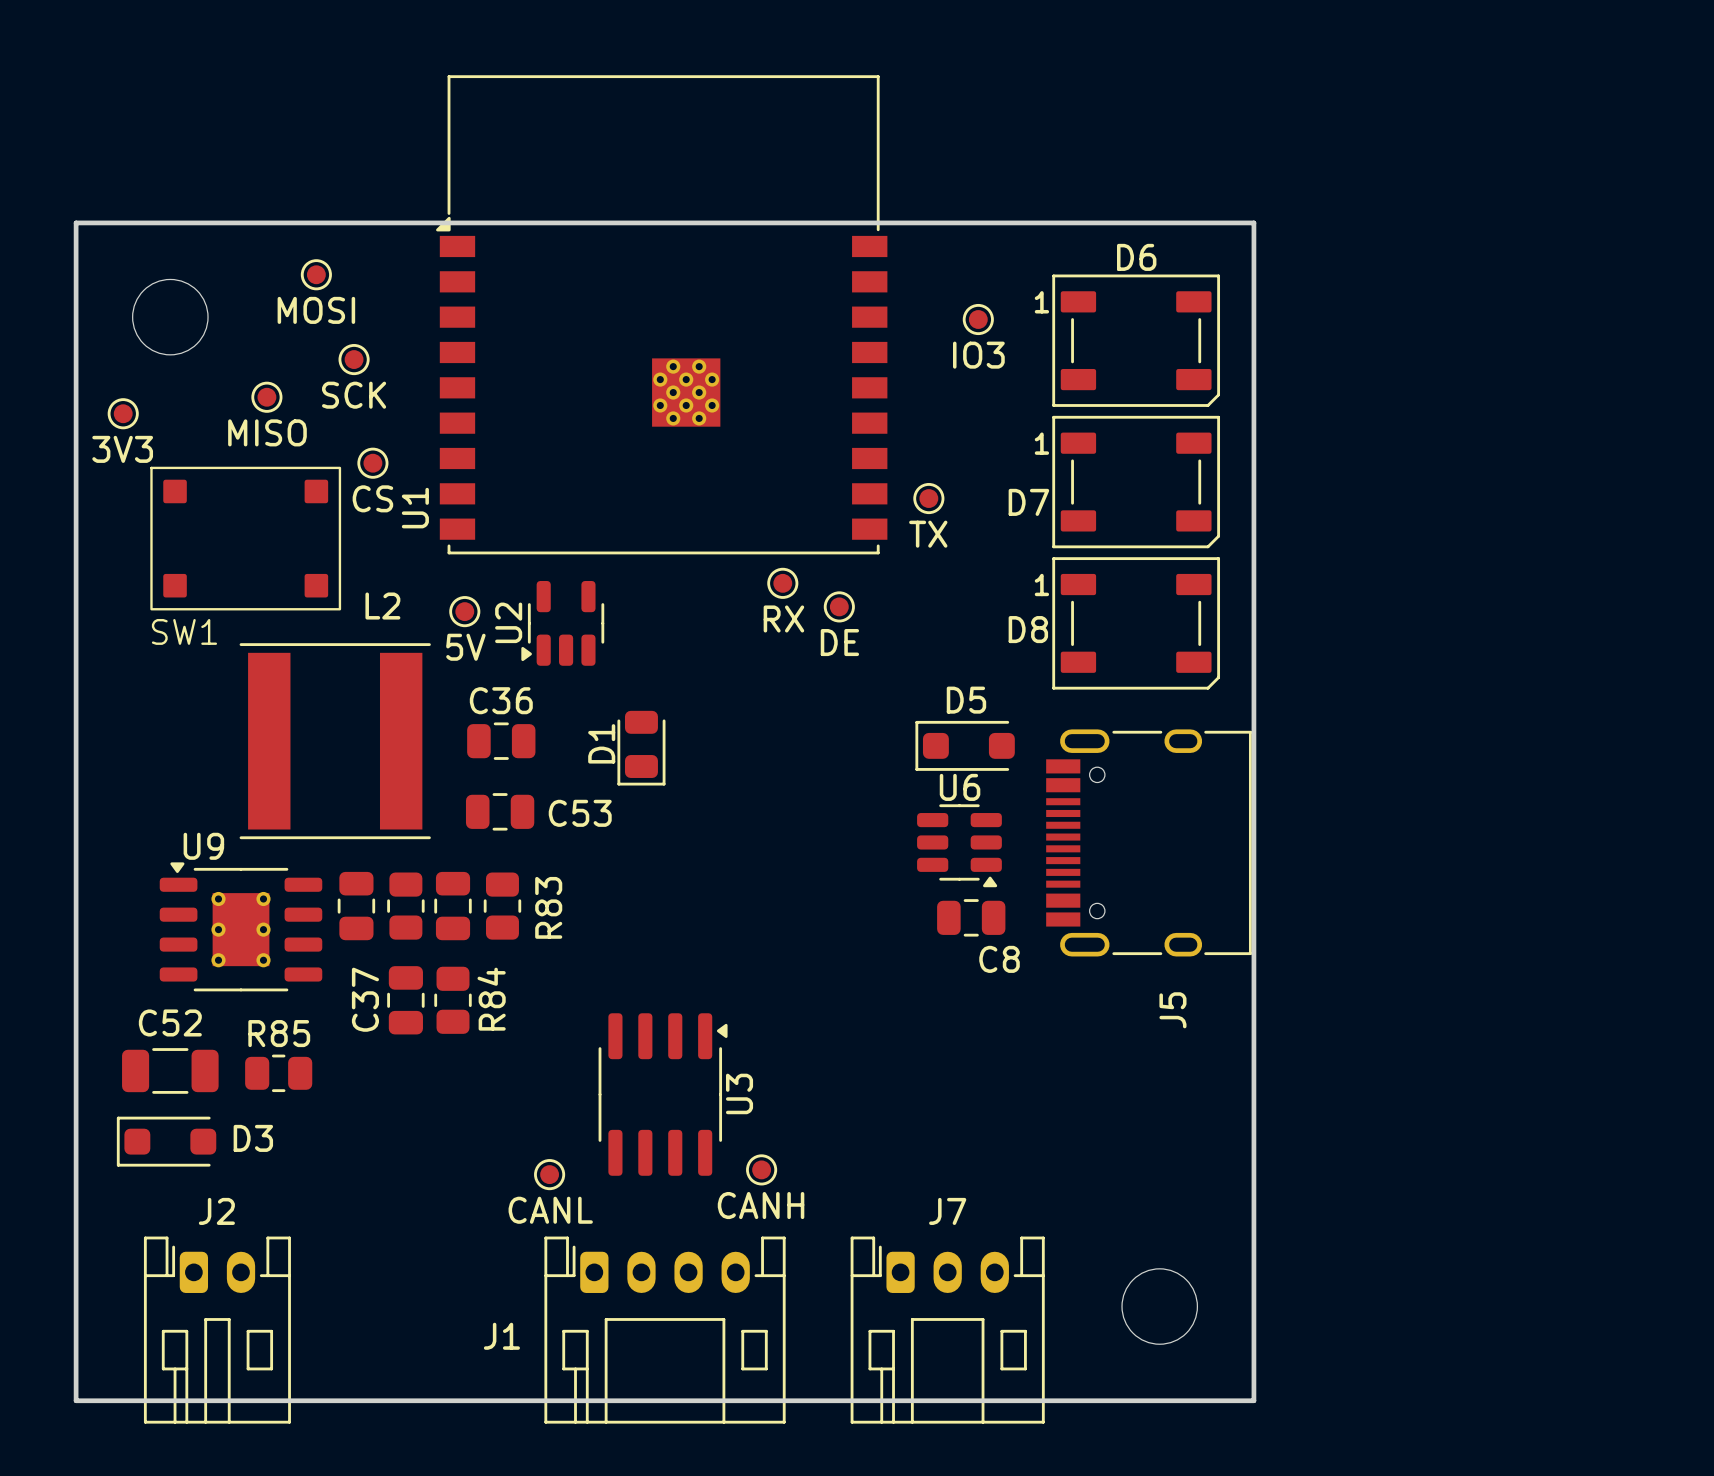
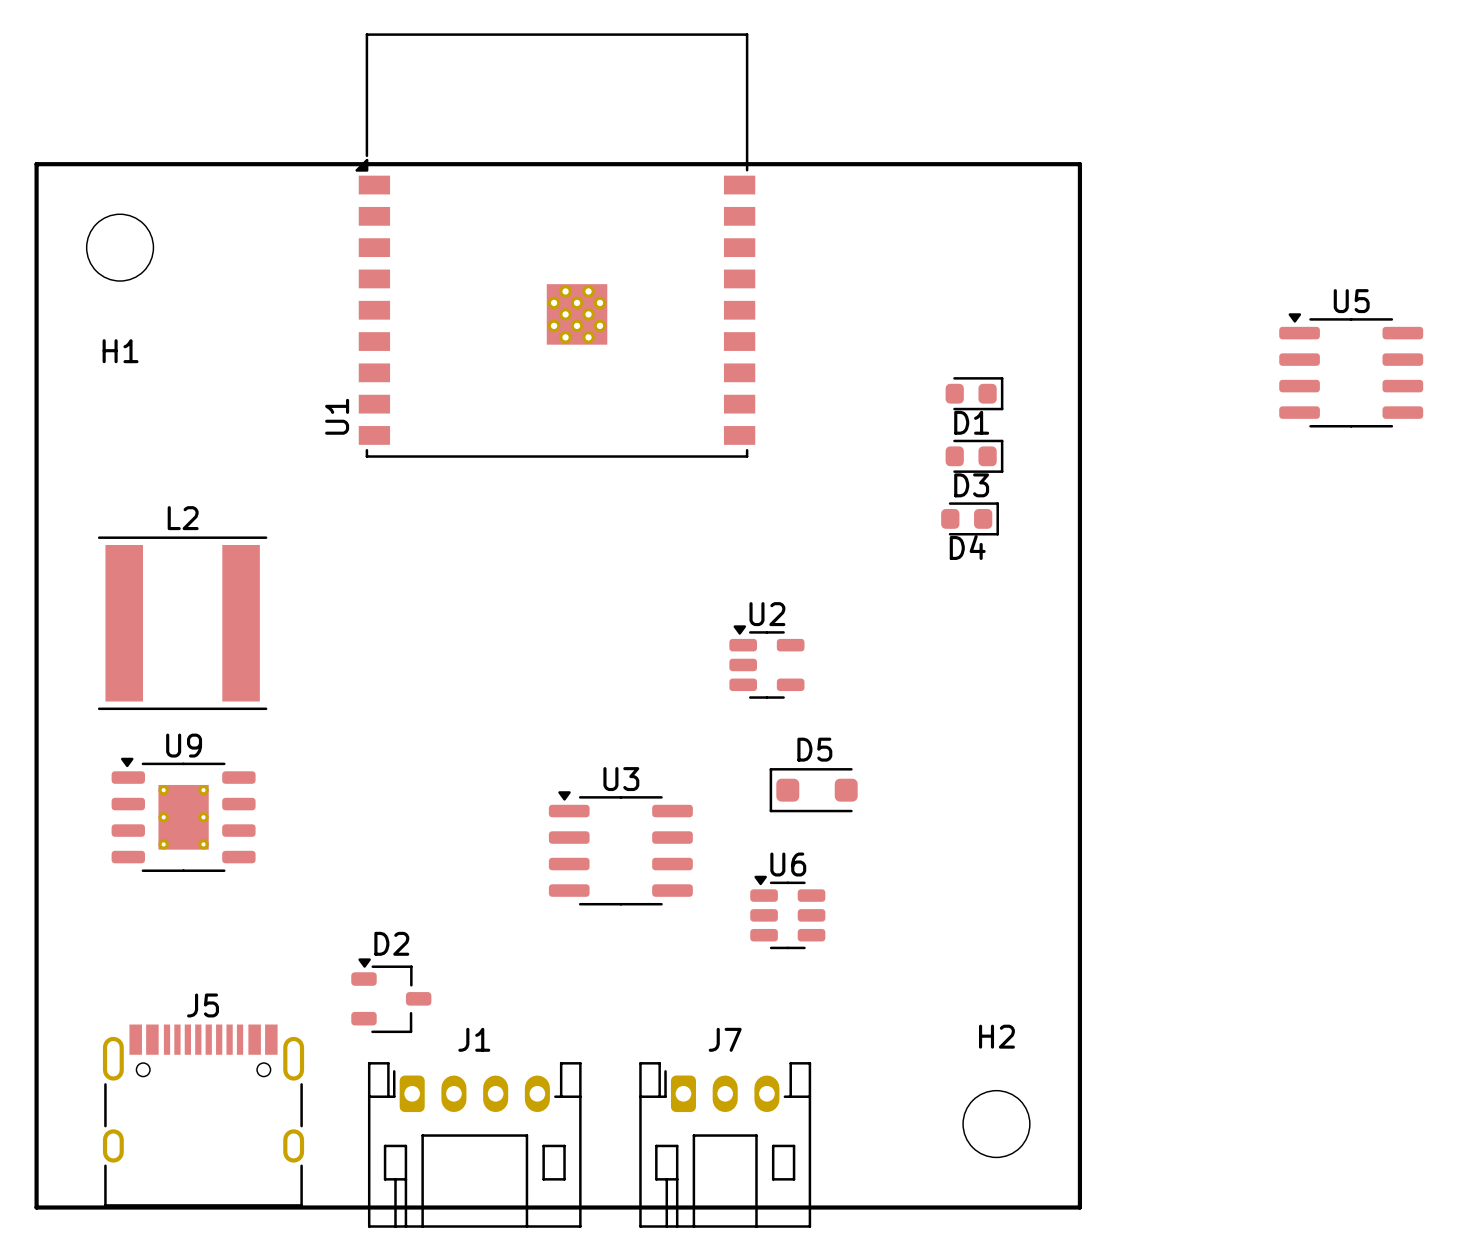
part: MOSI (316, 274) -> none
part: IO3 (978, 319) -> none
D6: (1136, 340) -> none
part: SCK (354, 359) -> none
part: MISO (266, 397) -> none
part: 3V3 (123, 413) -> none
H1 name: none -> H1 (120, 351)
U5: none -> (1351, 370)
part: CS (372, 463) -> none
D7: (1136, 482) -> none
part: TX (928, 498) -> none
SW1: (245, 538) -> none
part: RX (782, 583) -> none
L2 name position: L2 (382, 606) -> L2 (183, 518)
part: DE (839, 606) -> none
part: 5V (464, 611) -> none
U2 rotation: 0° (562, 623) -> 90° clockwise (766, 662)
U2 position: (562, 623) -> (766, 662)
D4: none -> (970, 518)
D8: (1136, 623) -> none
D1 footprint: [617, 710, 666, 786] -> [945, 377, 1004, 411]
L2 position: (335, 741) -> (182, 623)
C36: (501, 741) -> none
D1 name position: D1 (601, 743) -> D1 (971, 422)
D5 position: (965, 745) -> (813, 790)
C53: (500, 811) -> none
J5 rotation: 0° (1148, 842) -> 90° clockwise (203, 1115)
J5 position: (1148, 842) -> (203, 1115)
U6 rotation: 0° (959, 845) -> 180° (787, 912)
U6 position: (959, 845) -> (787, 912)
U9 footprint: [159, 862, 323, 992] -> [111, 757, 256, 872]
part: (356, 906) -> none
part: (405, 906) -> none
part: (453, 906) -> none
R83: (502, 906) -> none
C8: (971, 917) -> none
C37: (405, 1000) -> none
R84: (453, 1000) -> none
J5 name position: J5 (1172, 1010) -> J5 (203, 1005)
C52: (170, 1070) -> none
R85: (278, 1073) -> none
U3 rotation: 0° (663, 1094) -> 90° counterclockwise (620, 848)
U3 position: (663, 1094) -> (620, 848)
D3 footprint: [116, 1116, 217, 1167] -> [945, 439, 1004, 473]
D3 name position: D3 (253, 1138) -> D3 (971, 485)
D2: none -> (391, 995)
part: CANH (761, 1169) -> none
part: CANL (549, 1174) -> none
H2 name: none -> H2 (996, 1036)
J2: (217, 1330) -> none
J1 position: (665, 1330) -> (474, 1144)
J7 position: (947, 1330) -> (725, 1144)
J1 name position: J1 (501, 1336) -> J1 (474, 1039)

